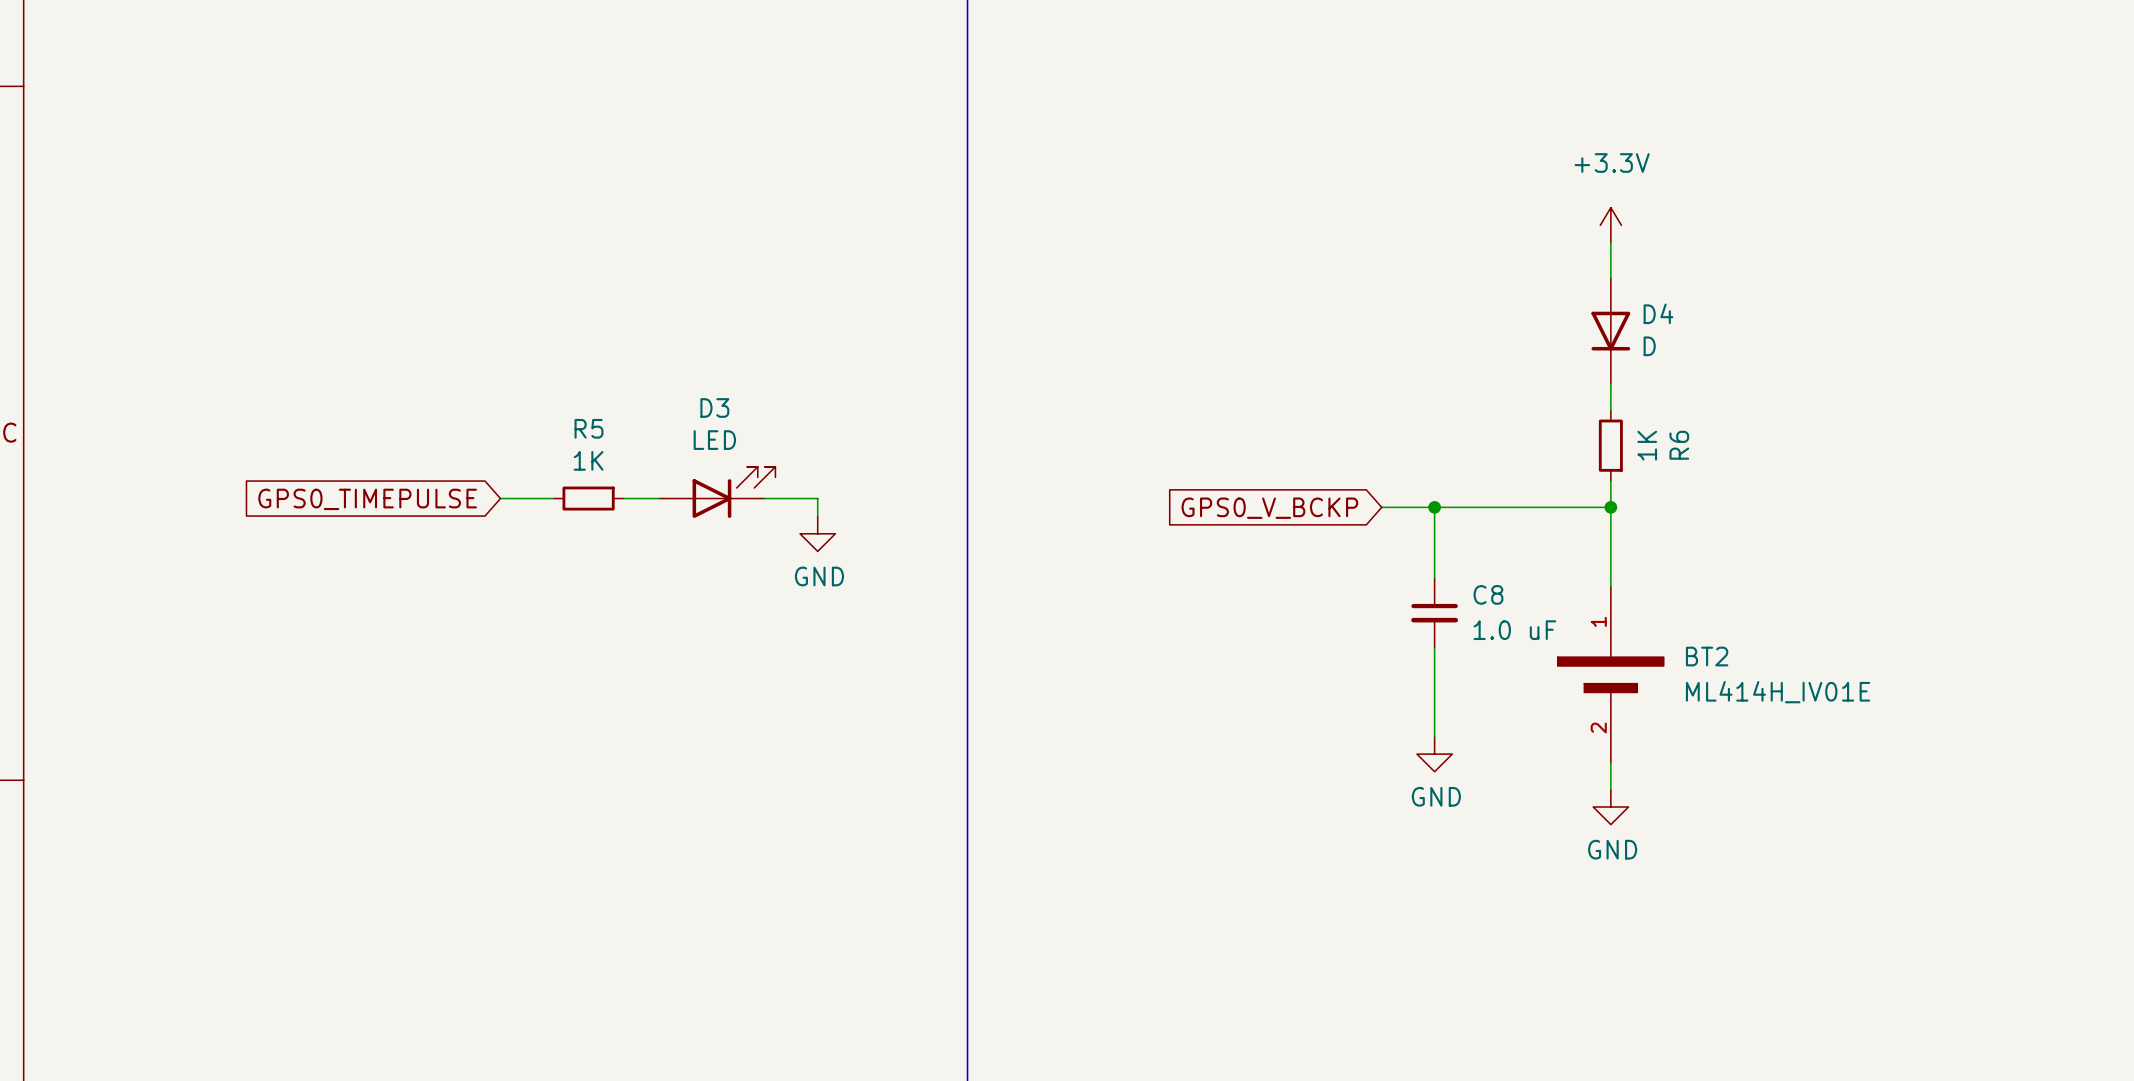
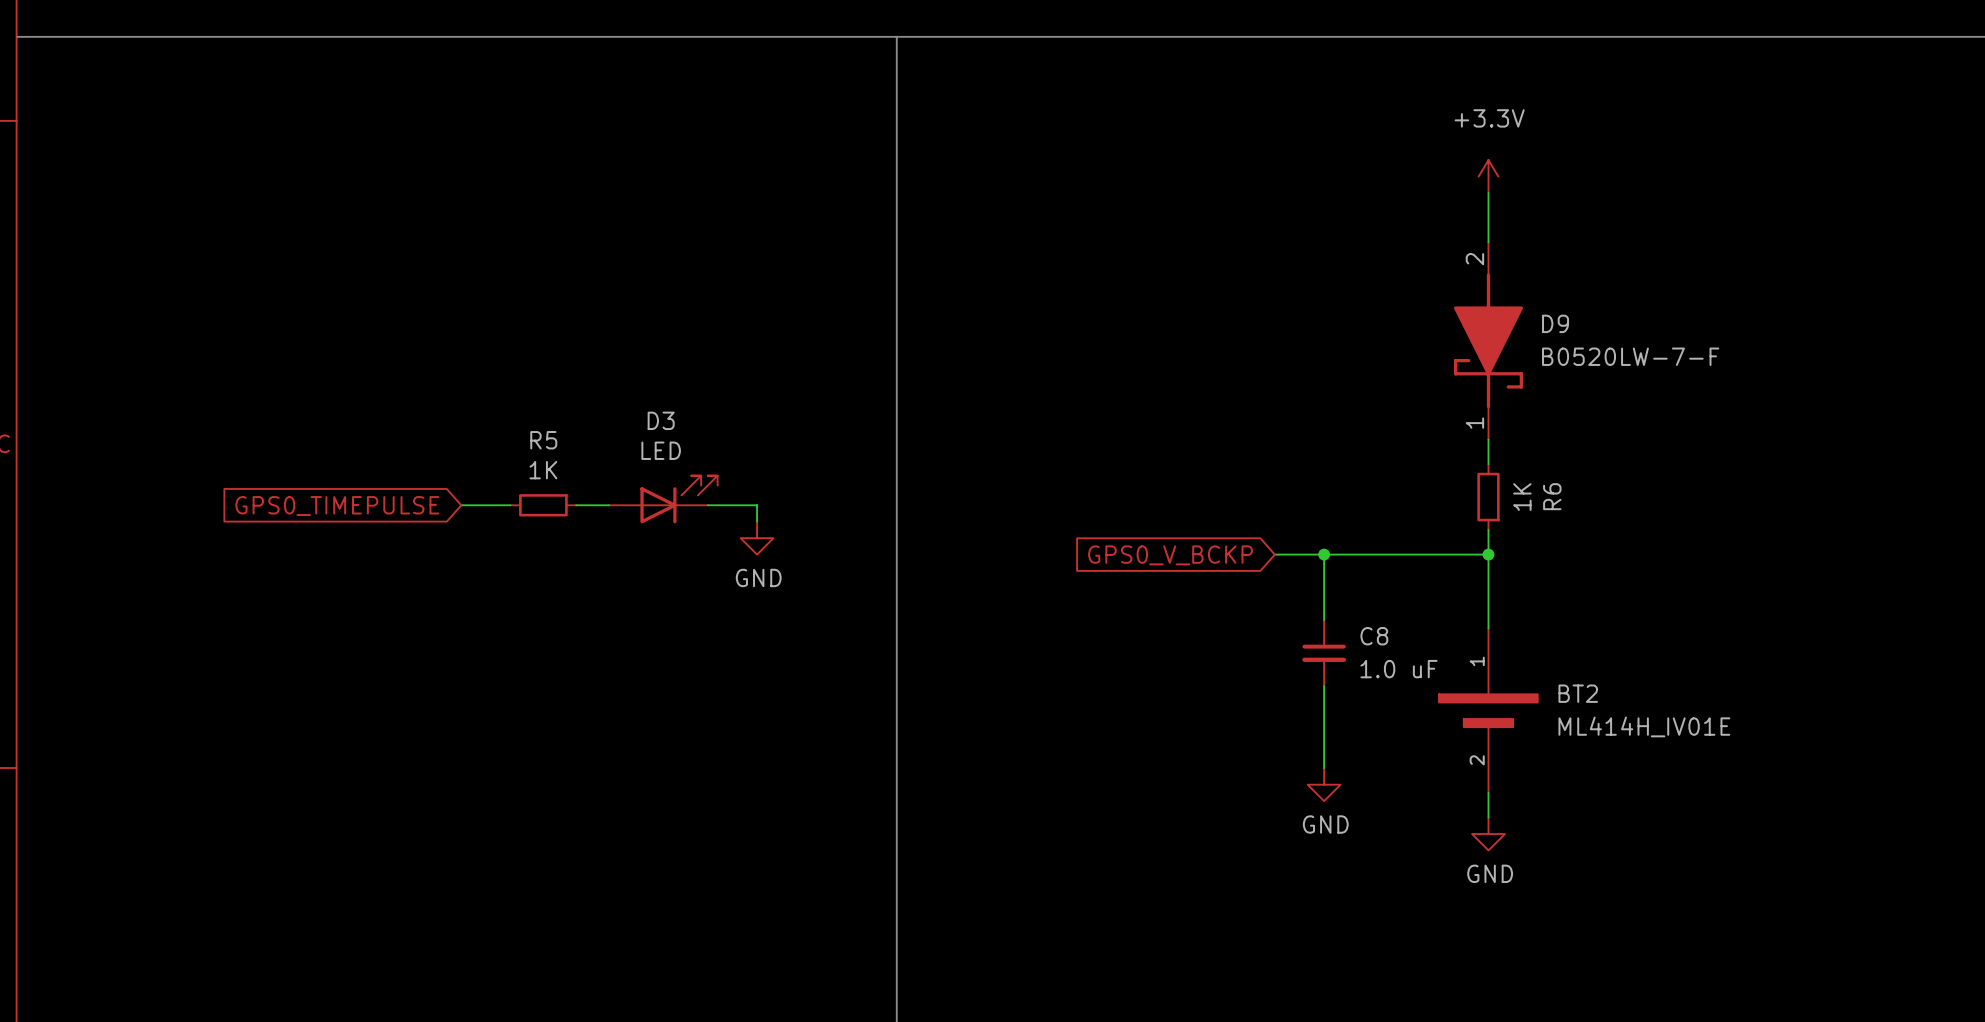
wire: none -> (1488, 192) (1488, 242)
power symbol position: +3.3V (1610, 225) -> +3.3V (1488, 176)
wire: (1610, 242) (1610, 278) -> none
D9: none -> B0520LW-7-F (1488, 340)
D4: D (1610, 331) -> none
wire: (1610, 383) (1610, 410) -> (1488, 439) (1488, 464)
R6 position: (1610, 445) -> (1488, 497)
wire: (1610, 480) (1610, 586) -> (1488, 529) (1488, 628)
wire: (1381, 507) (1610, 507) -> (1274, 554) (1488, 554)
wire: (1434, 507) (1434, 577) -> (1324, 554) (1324, 620)
junction position: (1434, 507) -> (1324, 554)
junction position: (1610, 507) -> (1488, 554)
global label position: GPS0_V_BCKP (1269, 508) -> GPS0_V_BCKP (1170, 555)
C8 position: (1434, 613) -> (1324, 653)
wire: (1434, 648) (1434, 736) -> (1324, 686) (1324, 768)
BT2 position: (1610, 674) -> (1488, 710)
power symbol position: GND (1434, 754) -> GND (1324, 784)
wire: (1610, 762) (1610, 789) -> (1488, 792) (1488, 817)
power symbol position: GND (1610, 806) -> GND (1488, 834)

